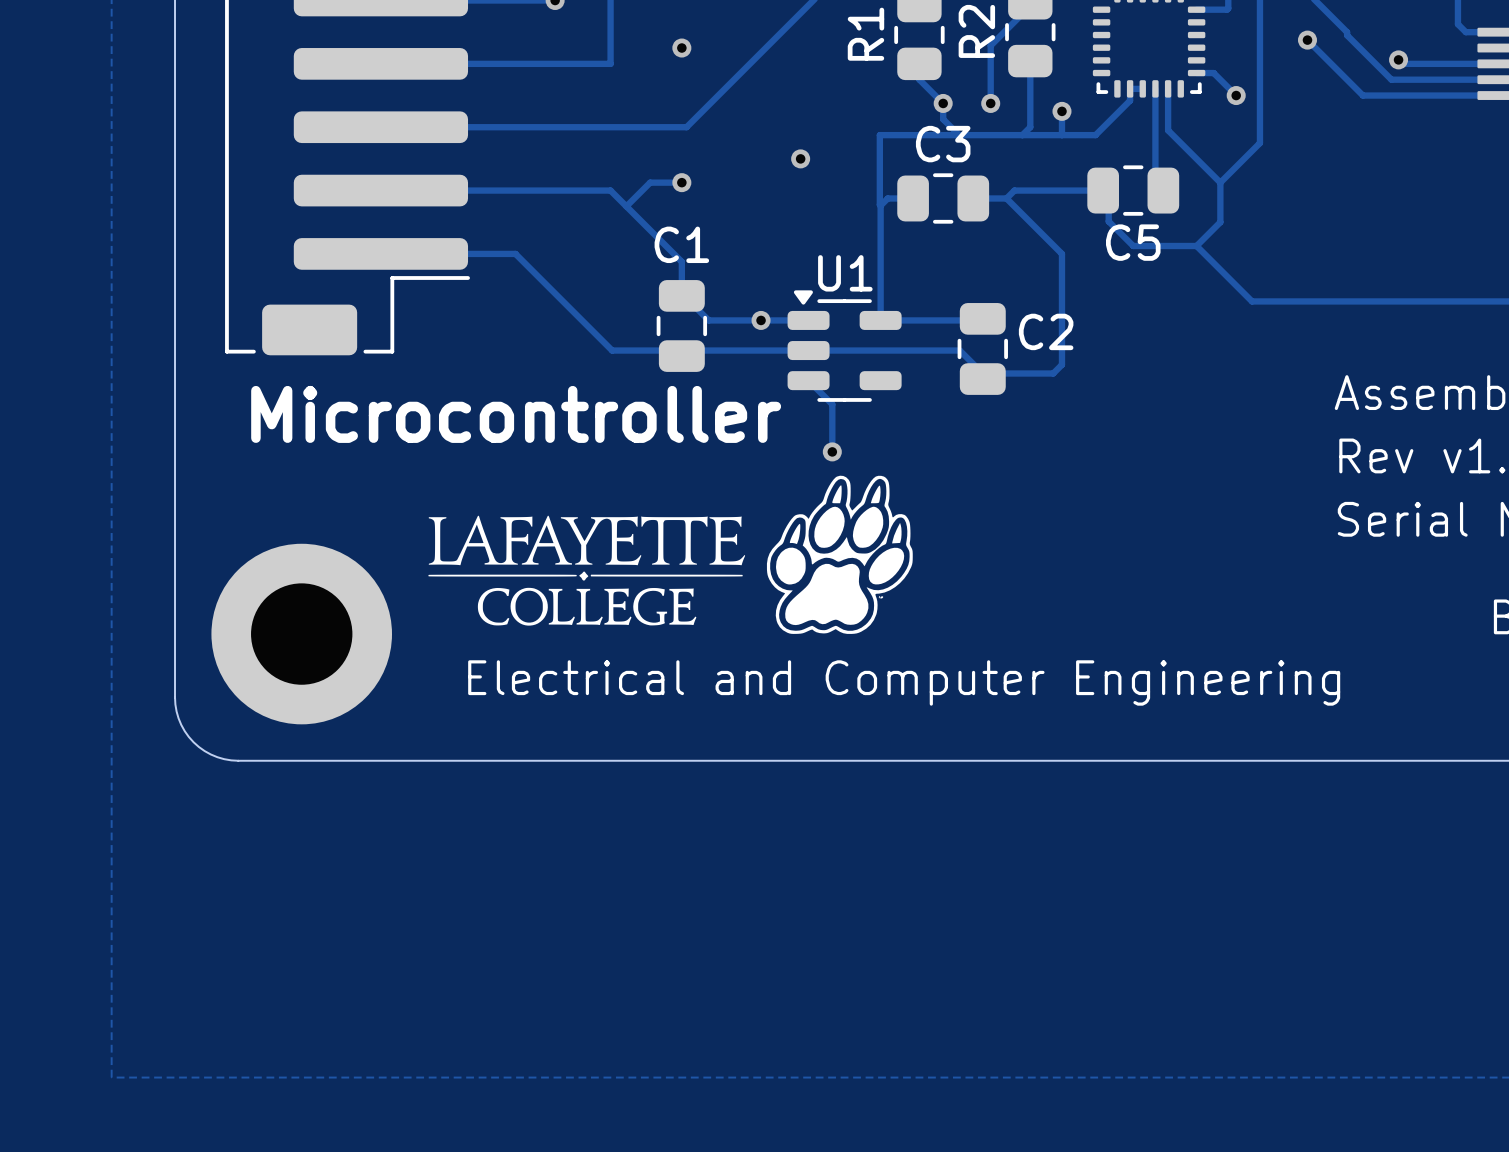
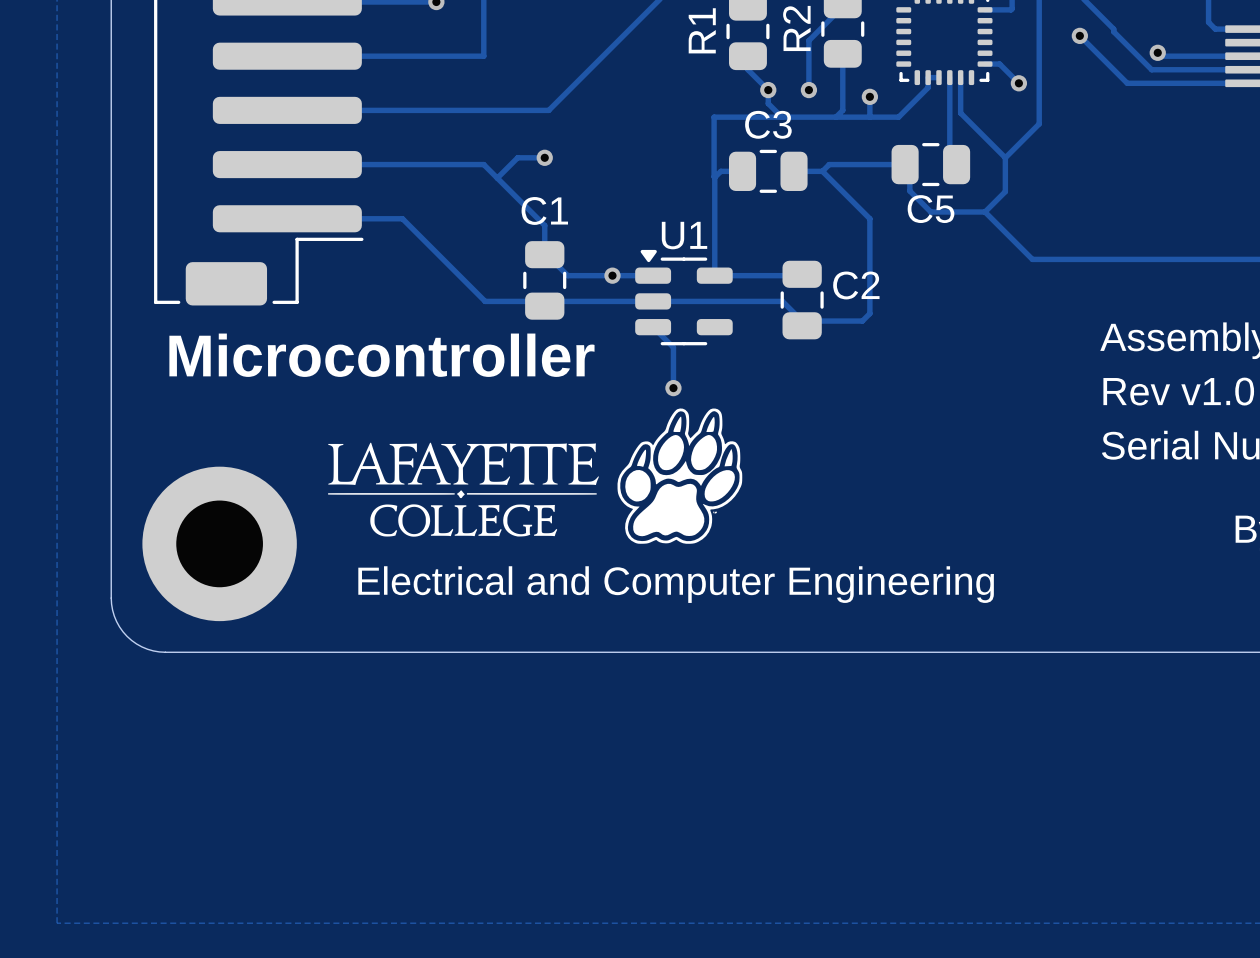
via: (681, 48) -> none
via: (800, 158) -> none

